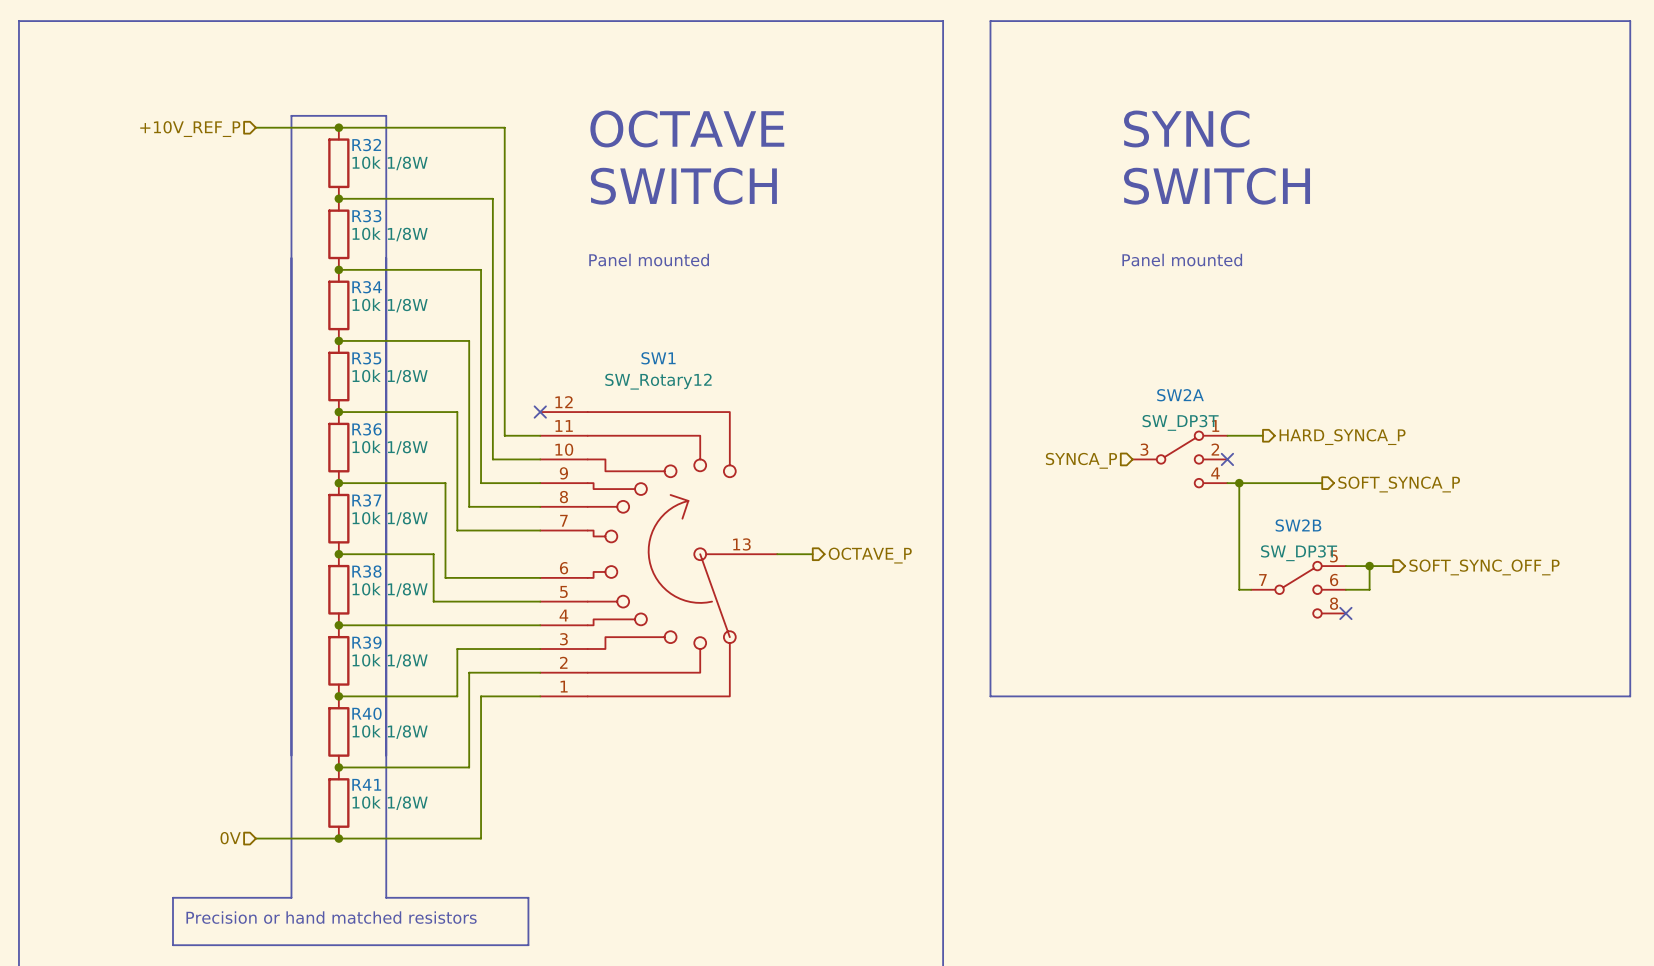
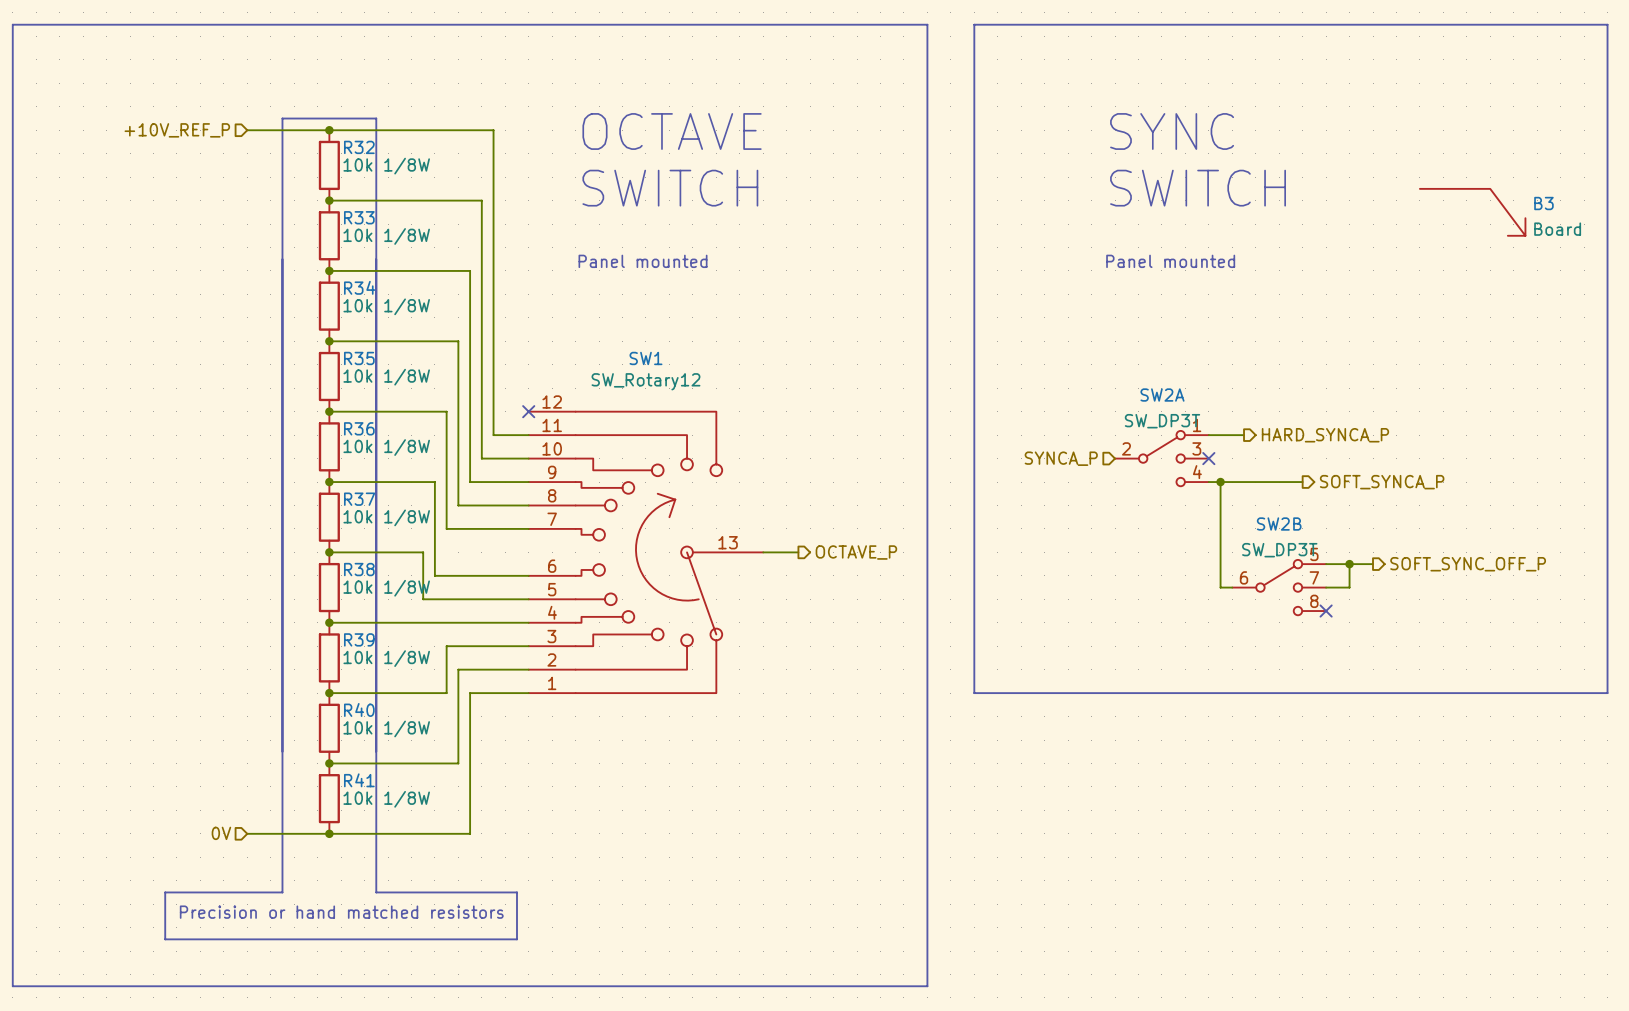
B3: none -> Board (1472, 212)
SW2A pin number: 3 (1144, 449) -> 2 (1126, 448)
SW2A pin number: 2 (1215, 449) -> 3 (1196, 448)
SW2B pin number: 7 (1262, 579) -> 6 (1244, 577)
SW2B pin number: 6 (1334, 580) -> 7 (1314, 577)

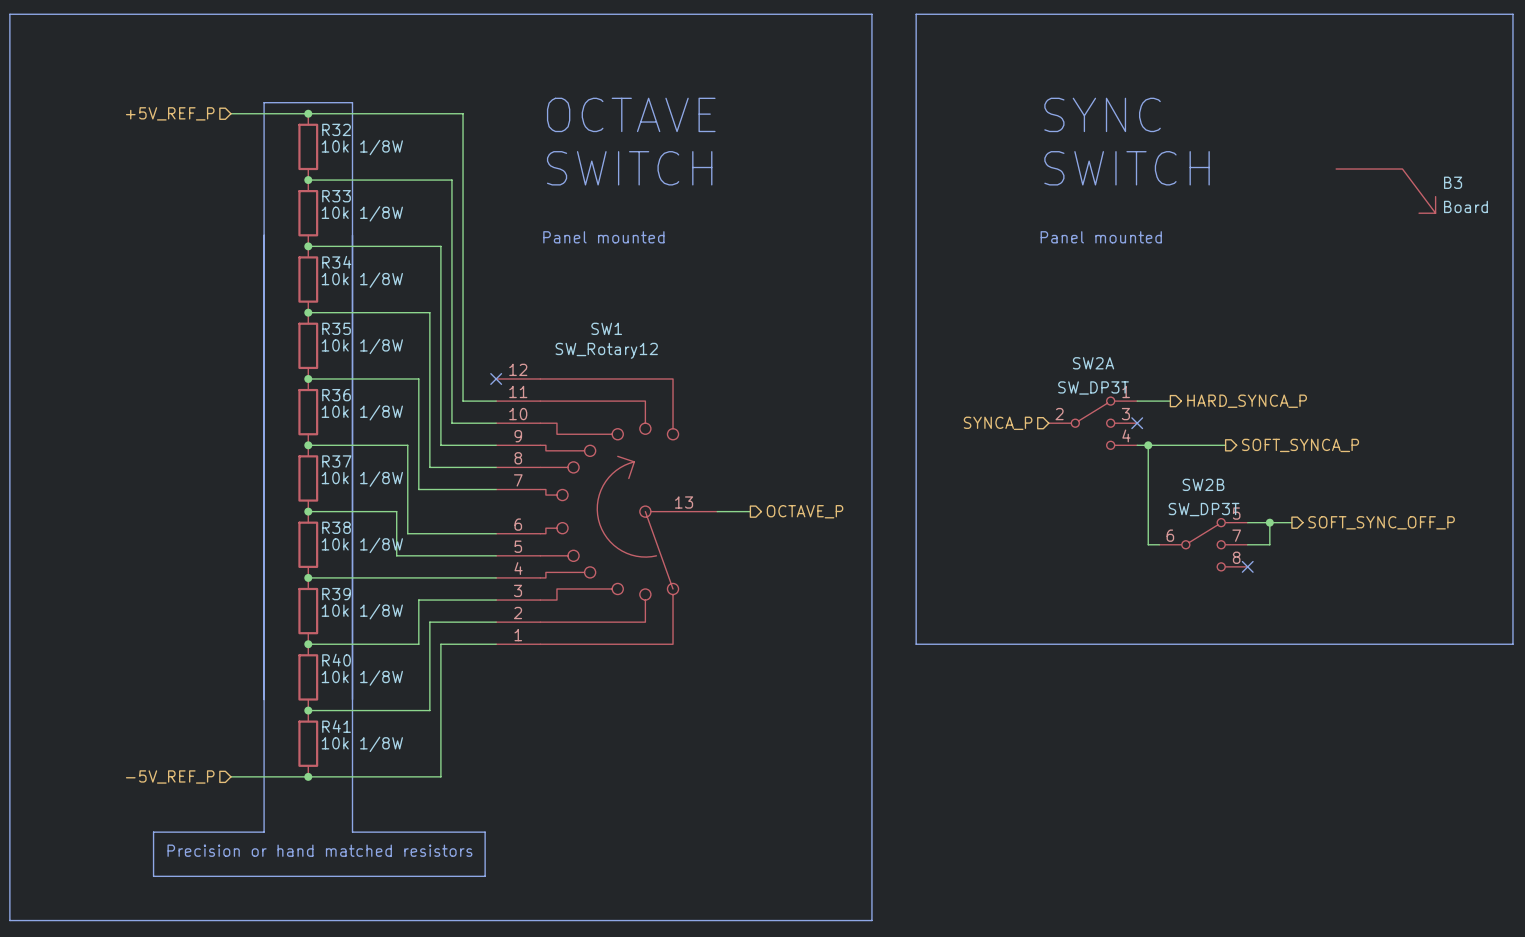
hierarchical label: +10V_REF_P (177, 130) -> +5V_REF_P (170, 113)
hierarchical label: 0V (221, 833) -> -5V_REF_P (170, 776)

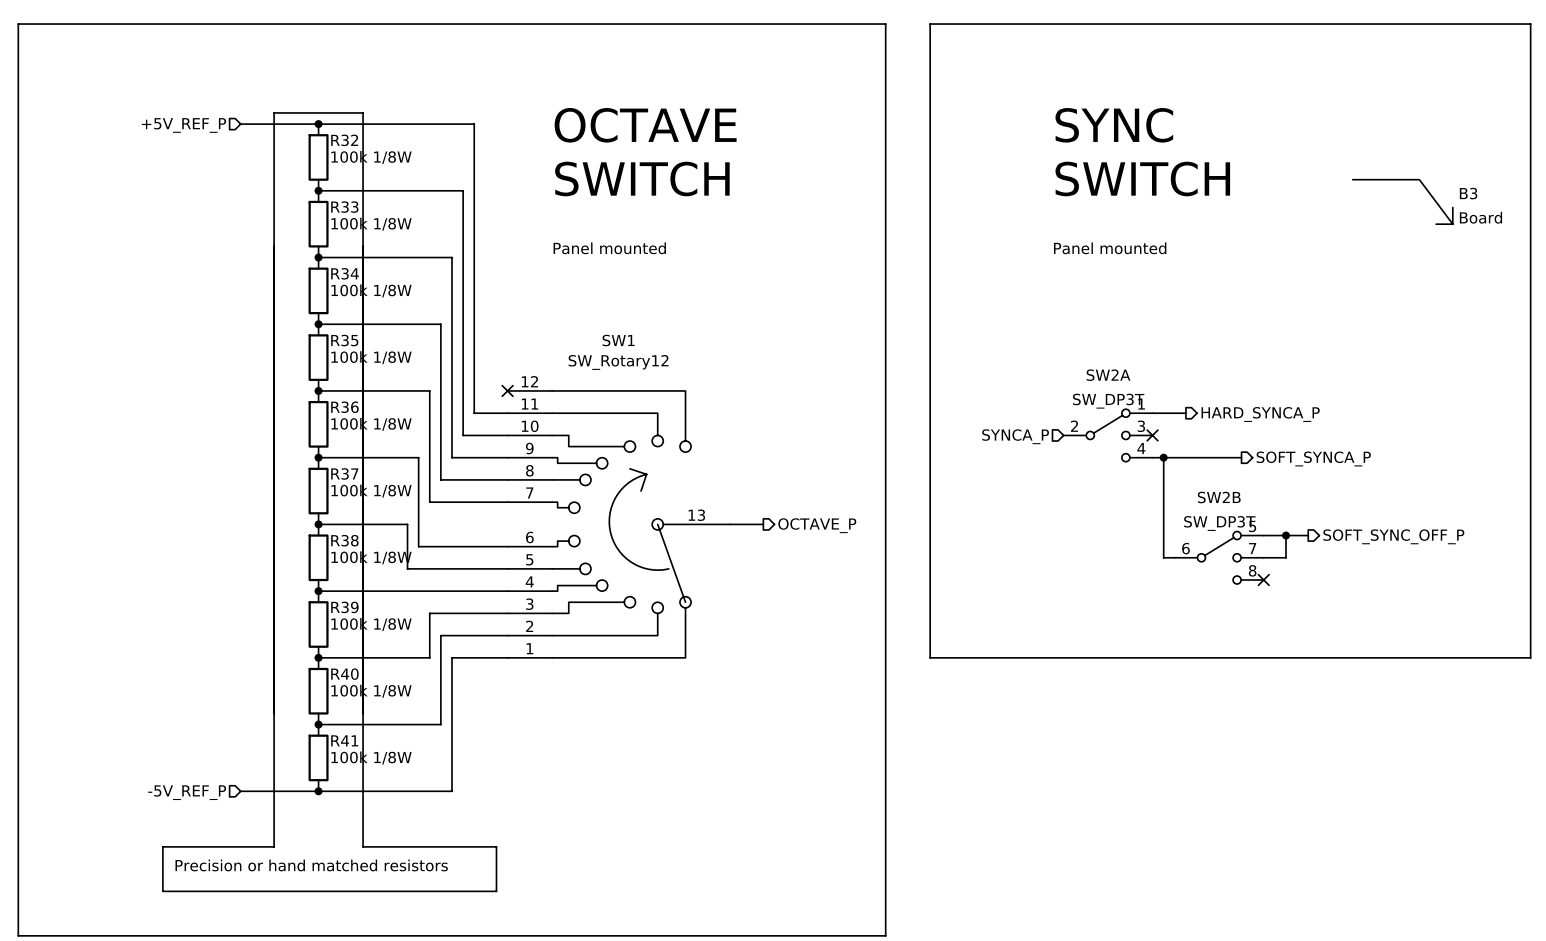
R32 value: 10k 1/8W (362, 147) -> 100k 1/8W (371, 157)
R33 value: 10k 1/8W (362, 213) -> 100k 1/8W (371, 224)
R34 value: 10k 1/8W (362, 280) -> 100k 1/8W (371, 290)
R35 value: 10k 1/8W (362, 346) -> 100k 1/8W (371, 357)
R36 value: 10k 1/8W (362, 412) -> 100k 1/8W (371, 424)
R37 value: 10k 1/8W (362, 479) -> 100k 1/8W (371, 491)
R38 value: 10k 1/8W (362, 545) -> 100k 1/8W (371, 557)
R39 value: 10k 1/8W (362, 611) -> 100k 1/8W (371, 624)
R40 value: 10k 1/8W (362, 678) -> 100k 1/8W (371, 691)
R41 value: 10k 1/8W (362, 744) -> 100k 1/8W (371, 757)

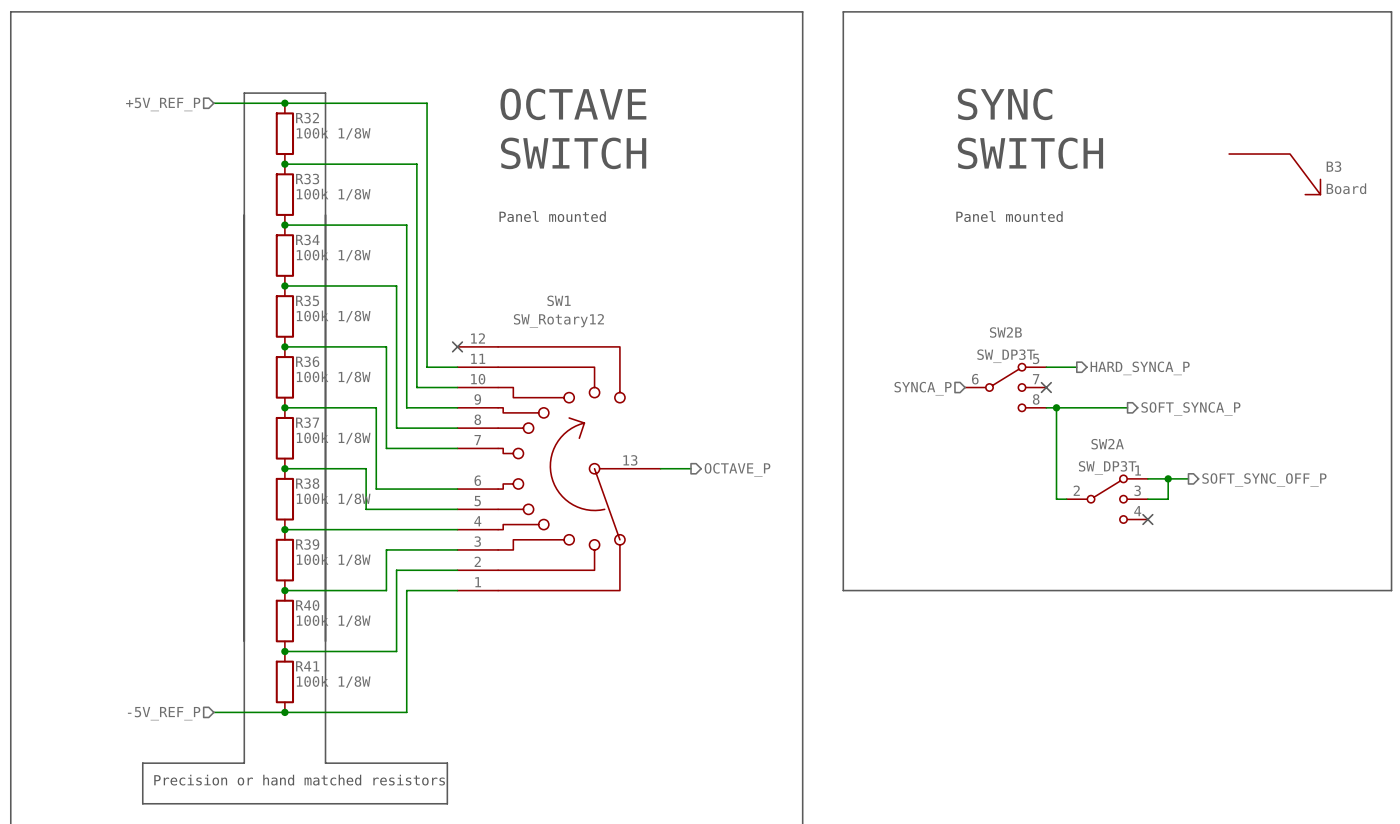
SW2A position: (1108, 435) -> (1107, 499)
SW2B position: (1219, 557) -> (1005, 387)

